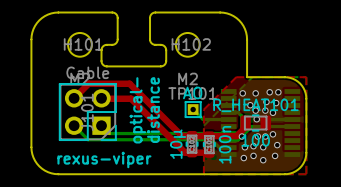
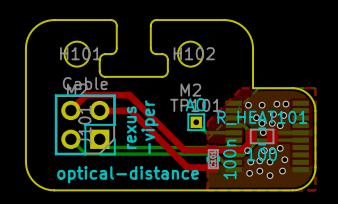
text: optical- (137, 110) -> none
text: distance (153, 110) -> none
text: none -> rexus (131, 127)
part: 10µ (192, 144) -> none
text: rexus-viper (104, 159) -> -viper (150, 127)
text: none -> optical-distance (128, 174)

